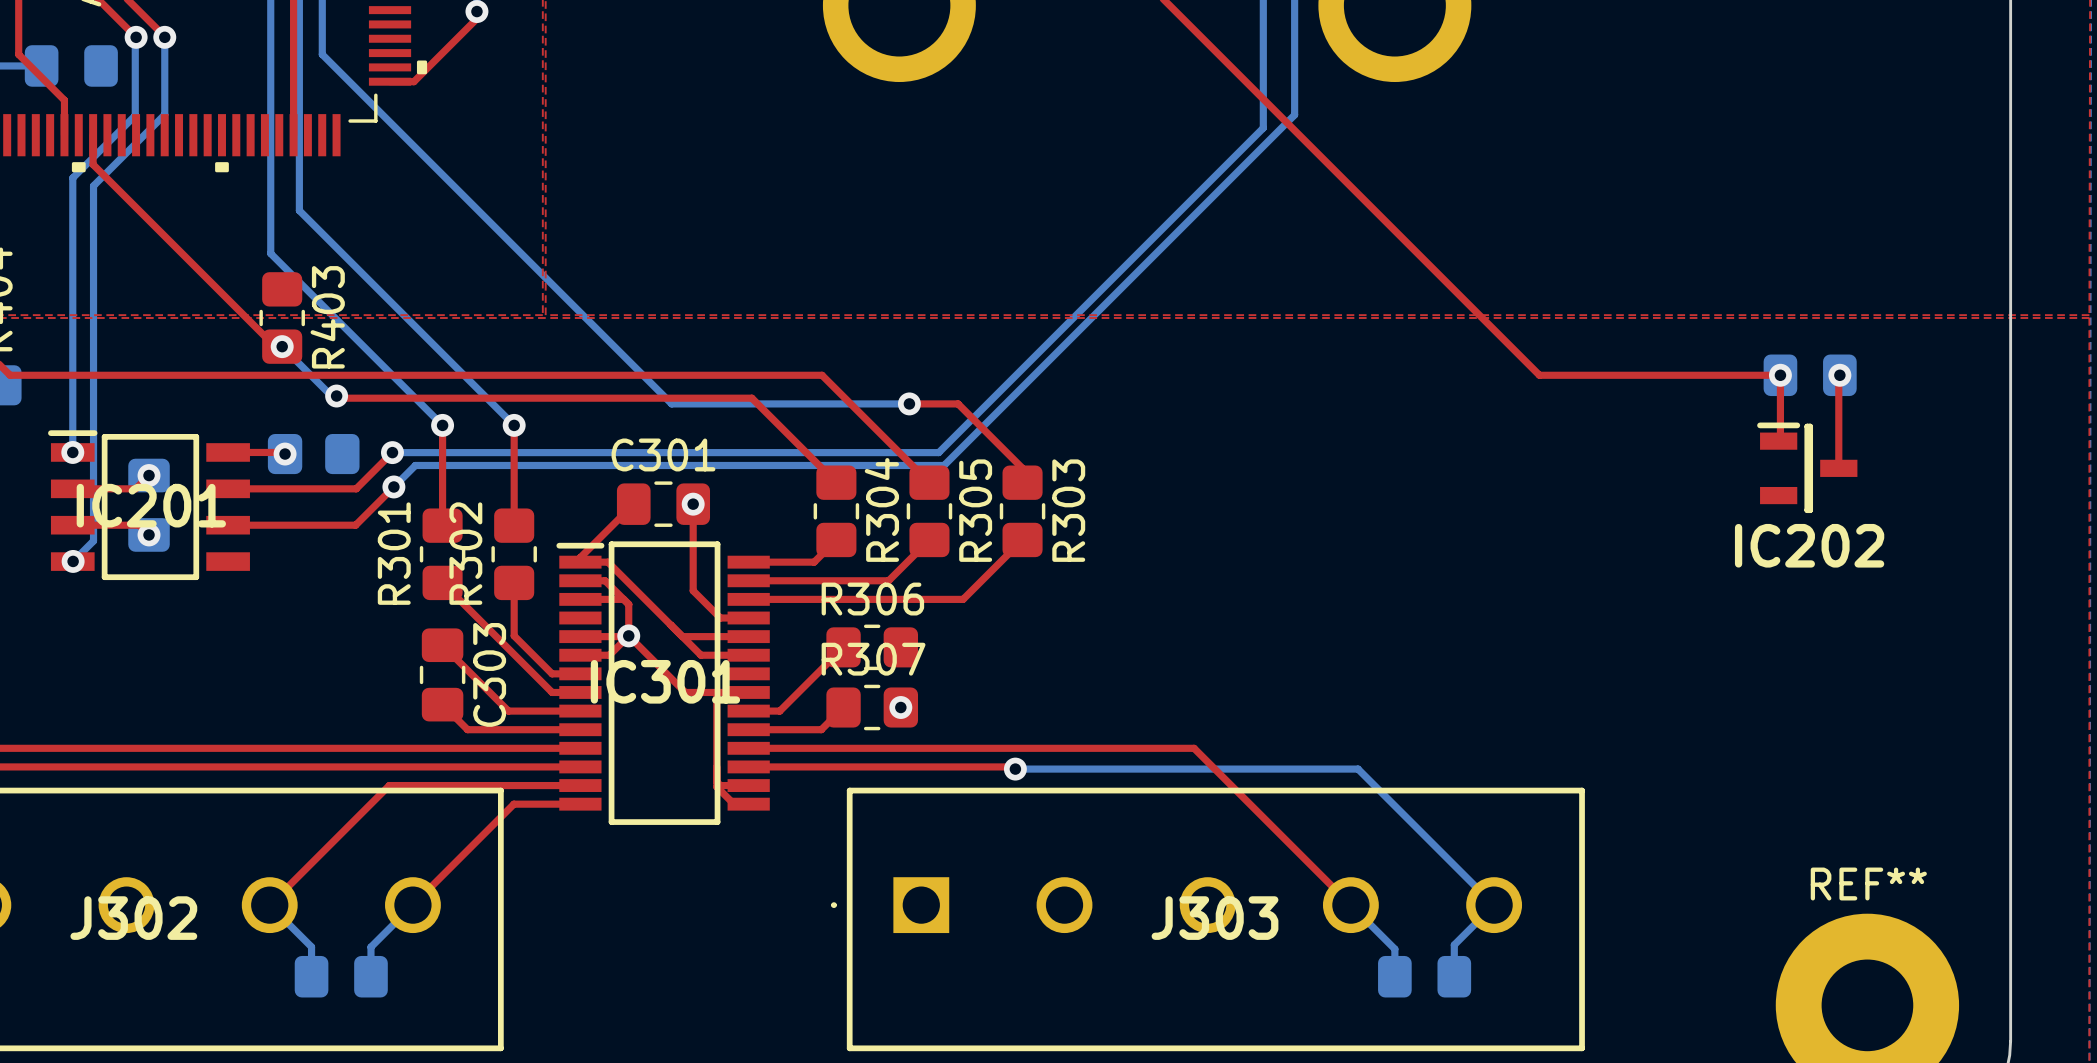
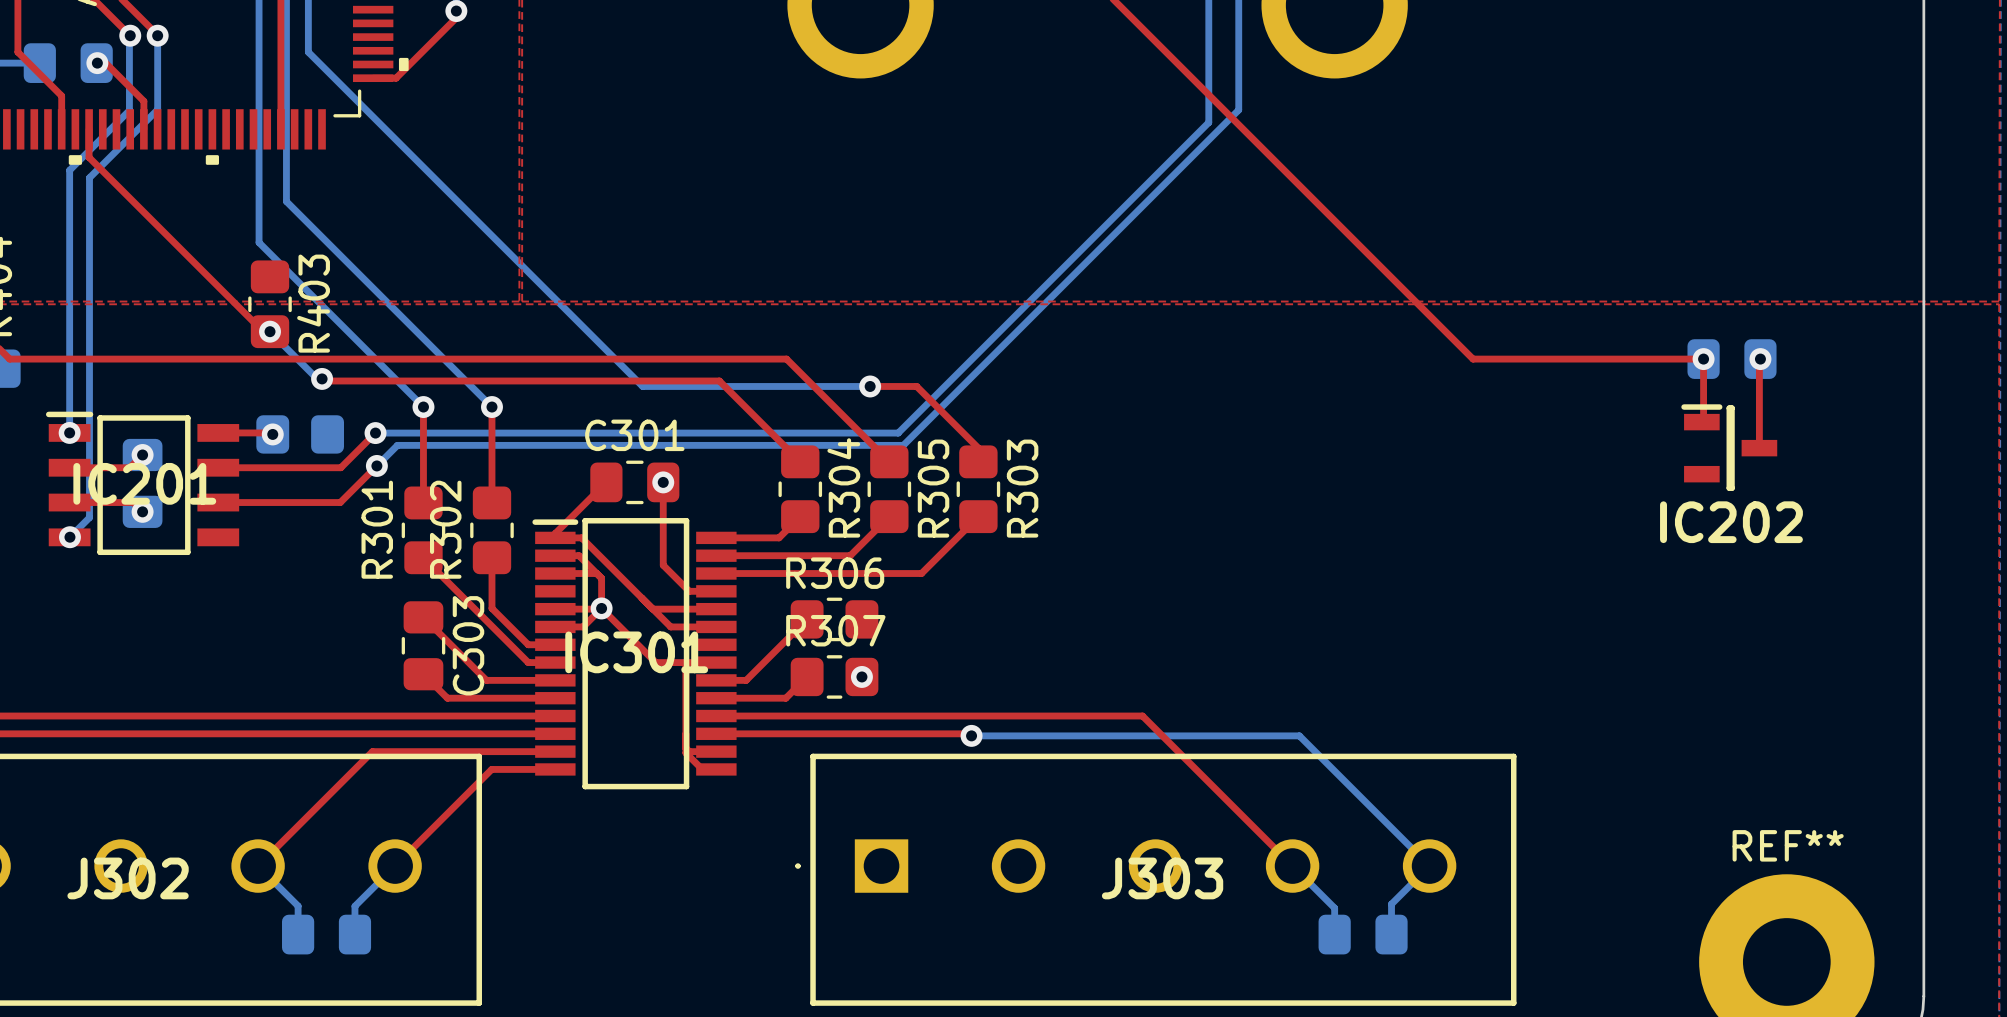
top track: none -> (97, 63) (105, 63) (143, 101) (143, 129)
via: none -> (97, 63)

